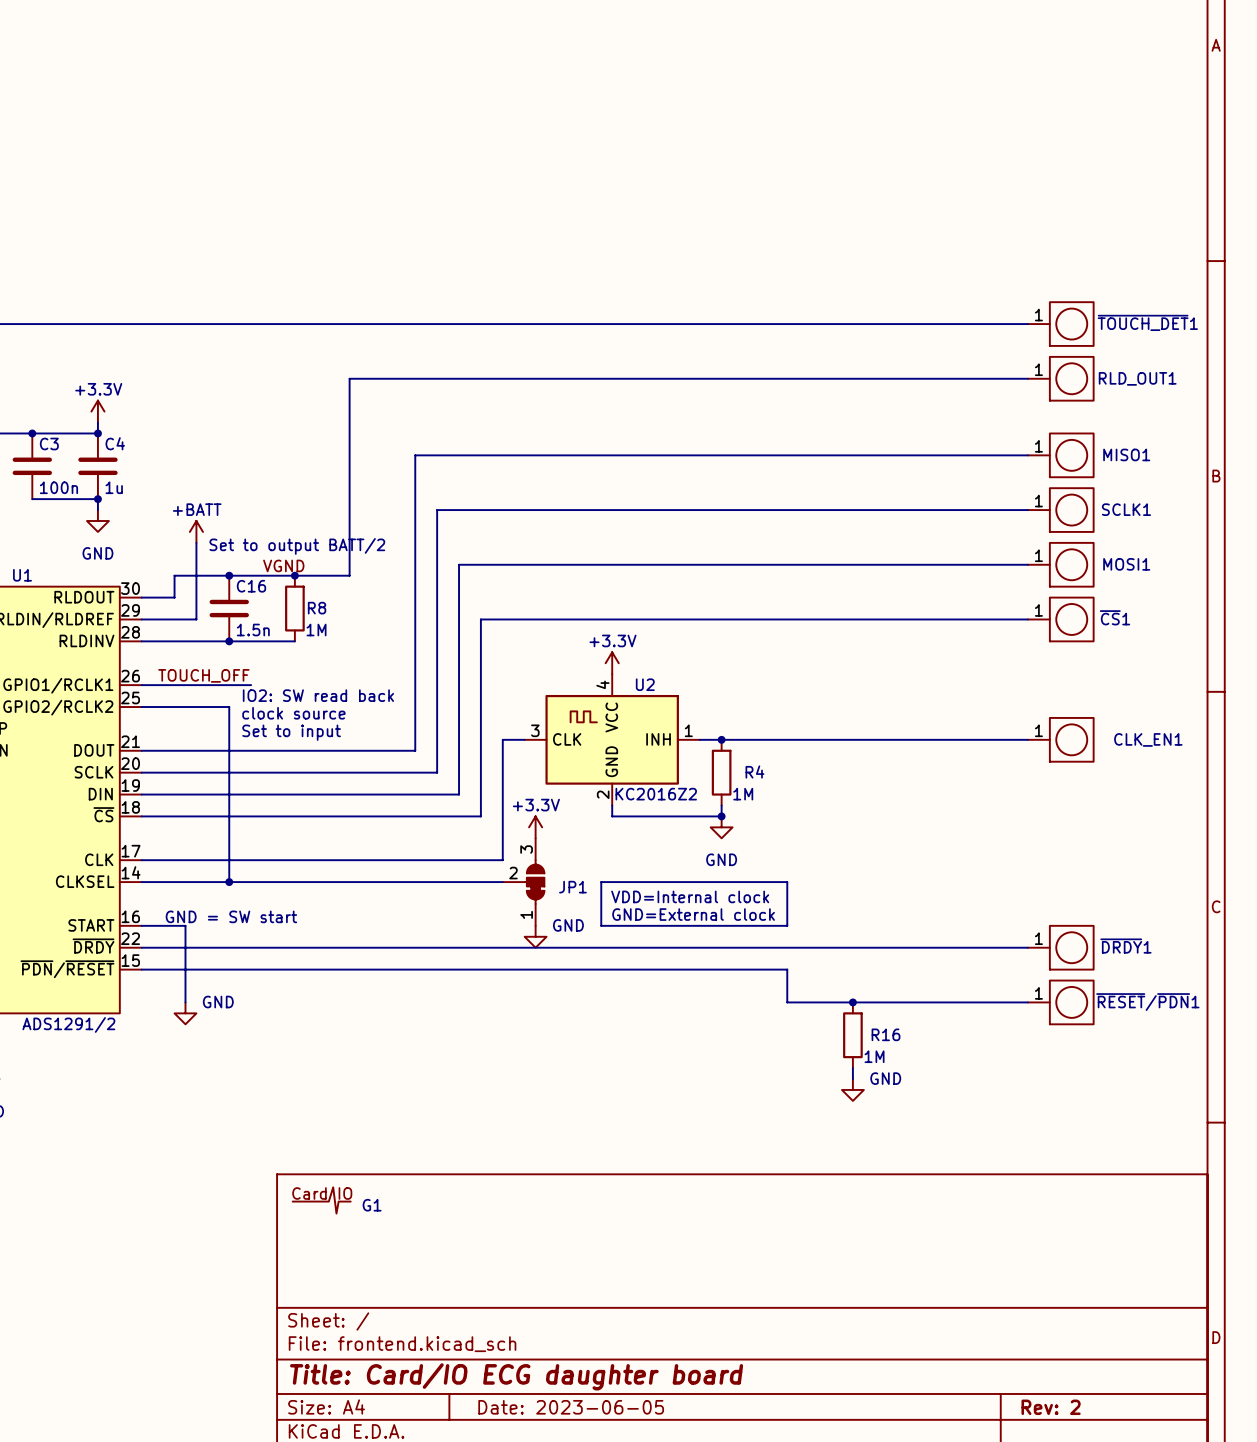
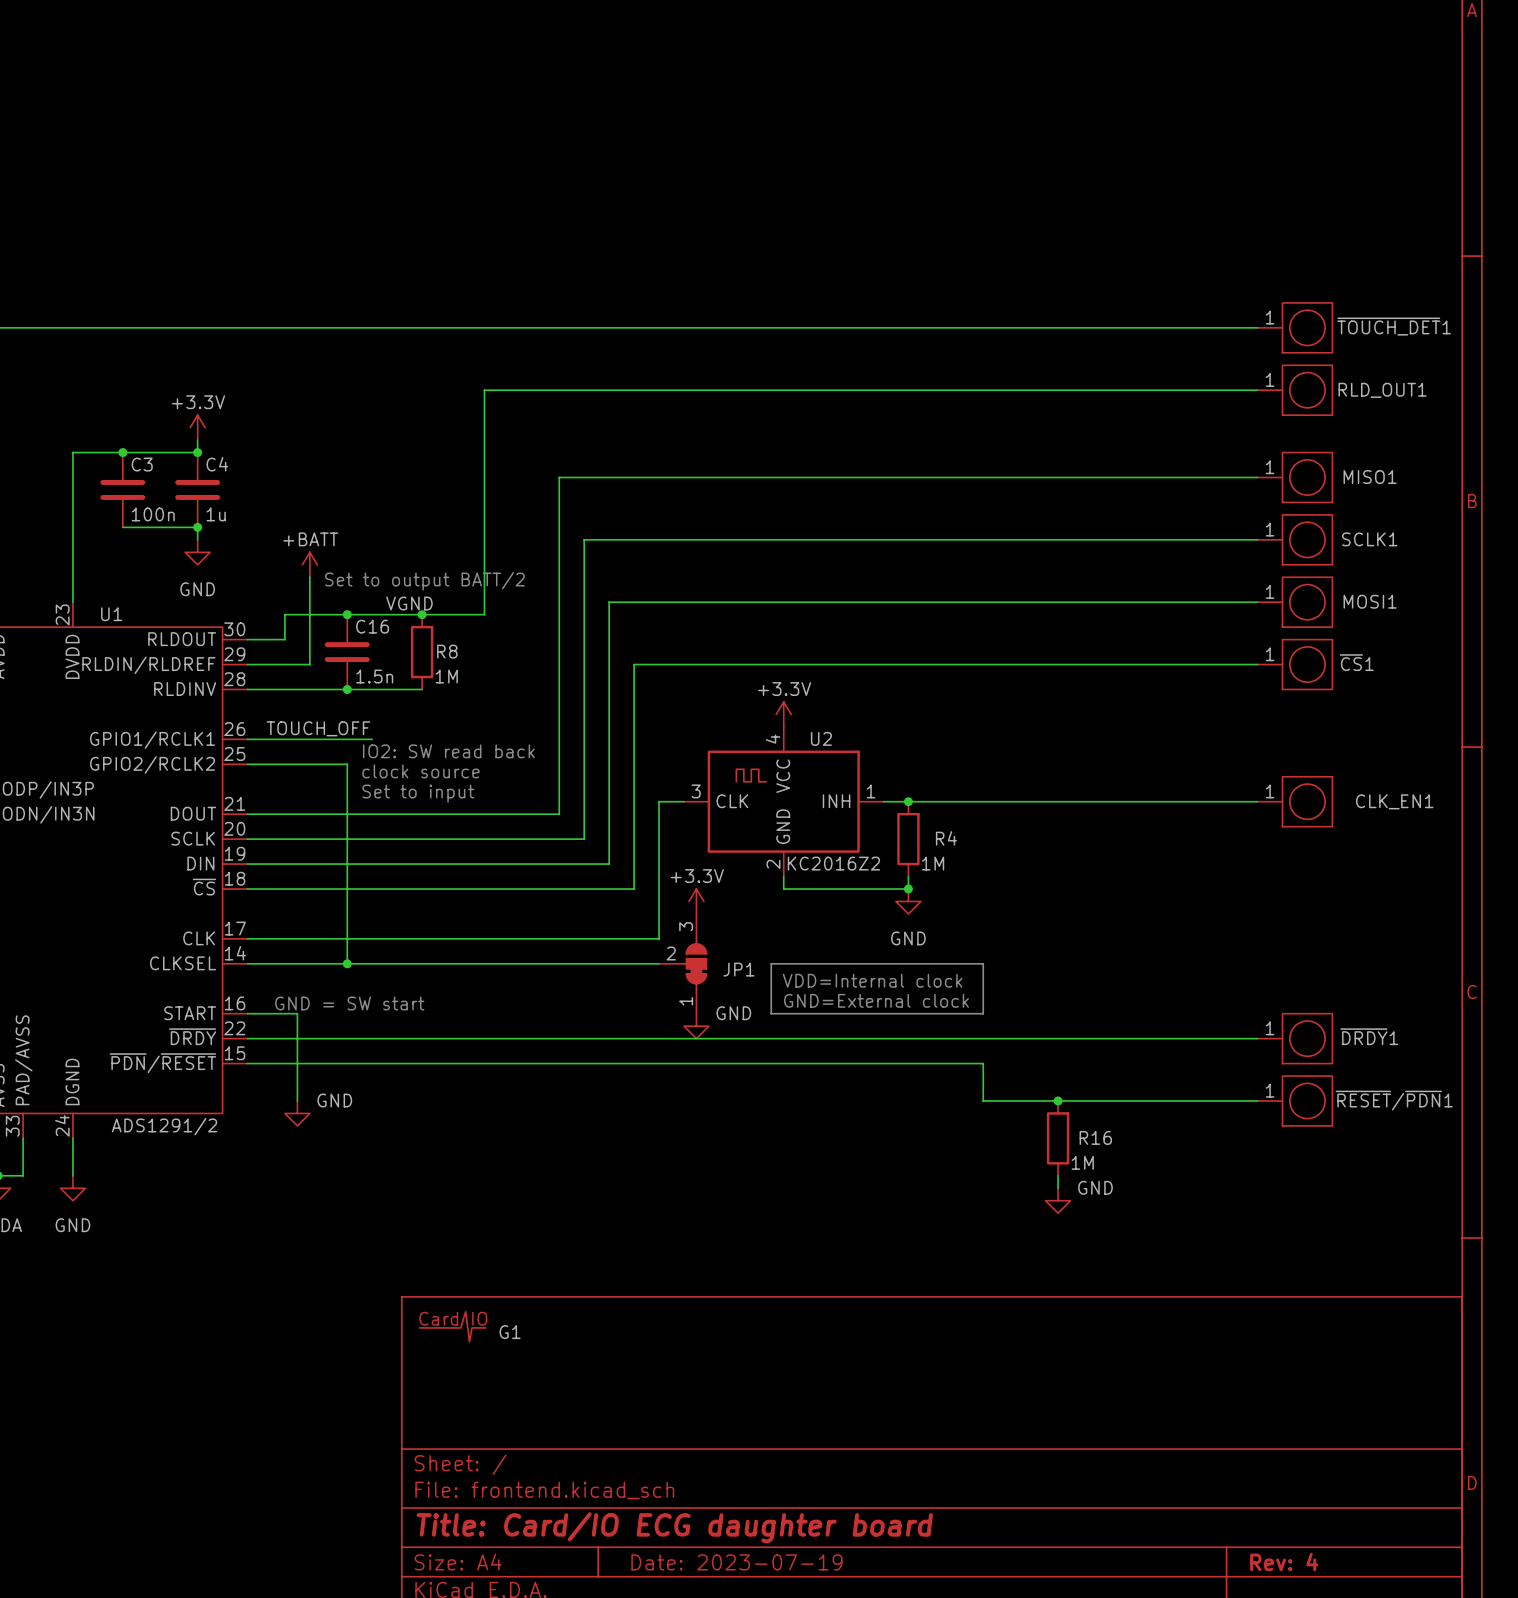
title block: Date: 2023-06-05 (571, 1407) -> Date: 2023-07-19 (736, 1562)
title block: Rev: 2 (1051, 1407) -> Rev: 4 (1284, 1562)

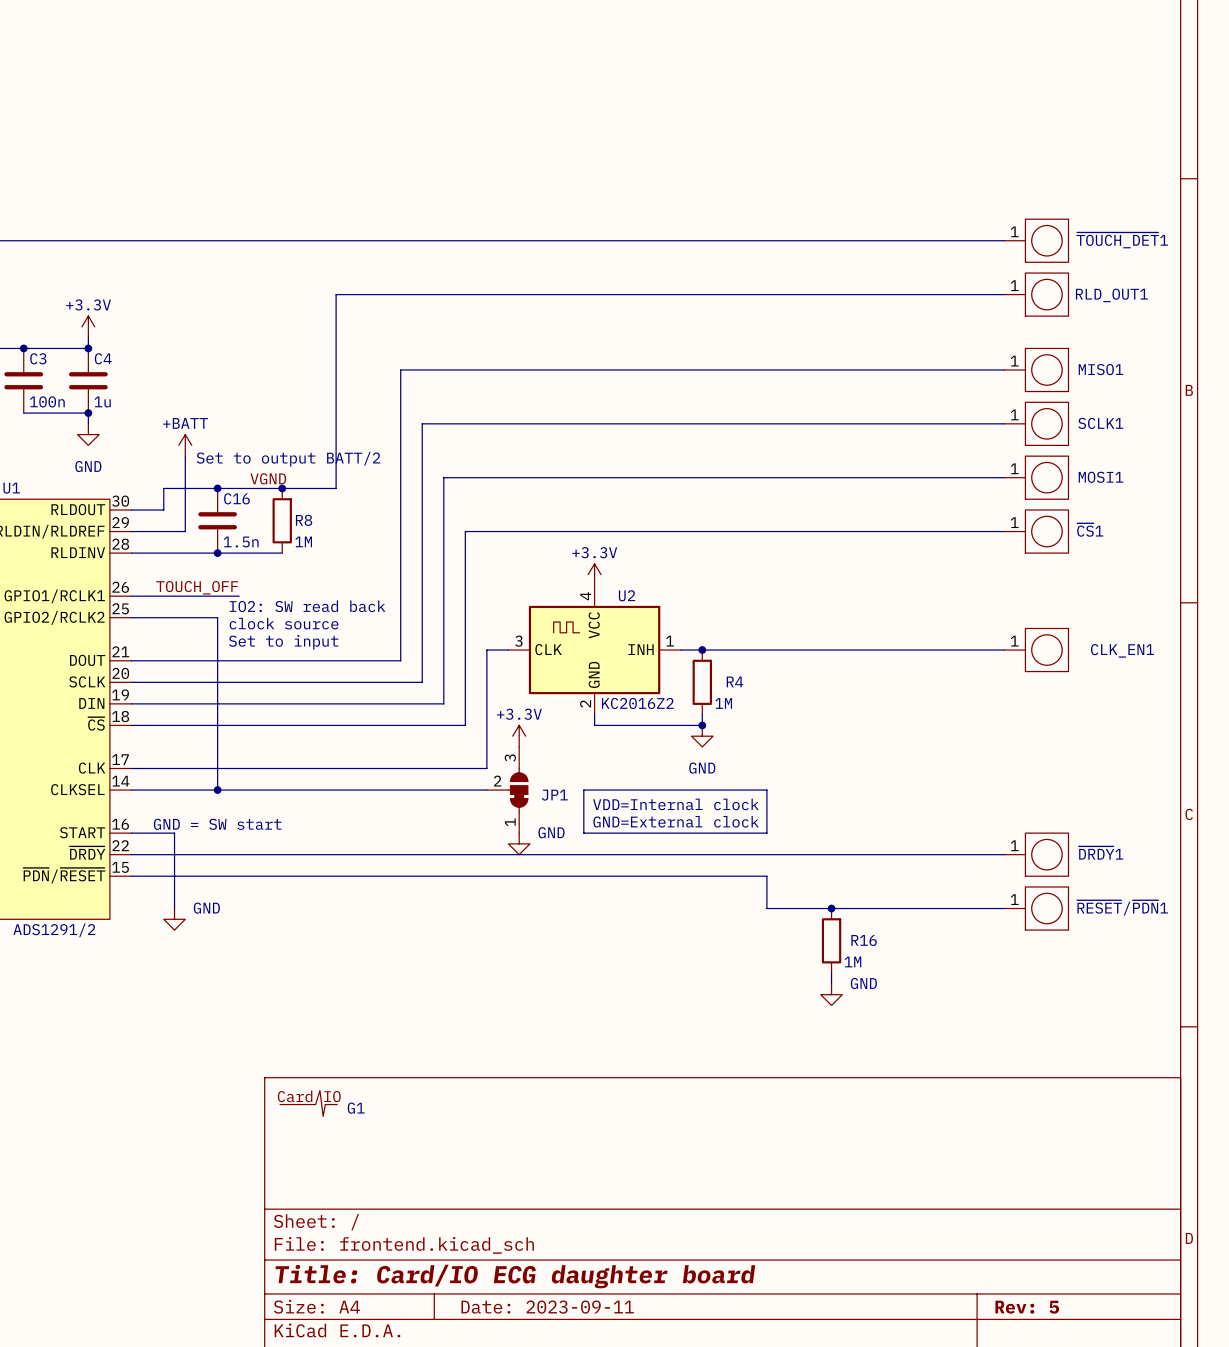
title block: Date: 2023-07-19 (736, 1562) -> Date: 2023-09-11 (547, 1307)
title block: Rev: 4 (1284, 1562) -> Rev: 5 (1027, 1307)

